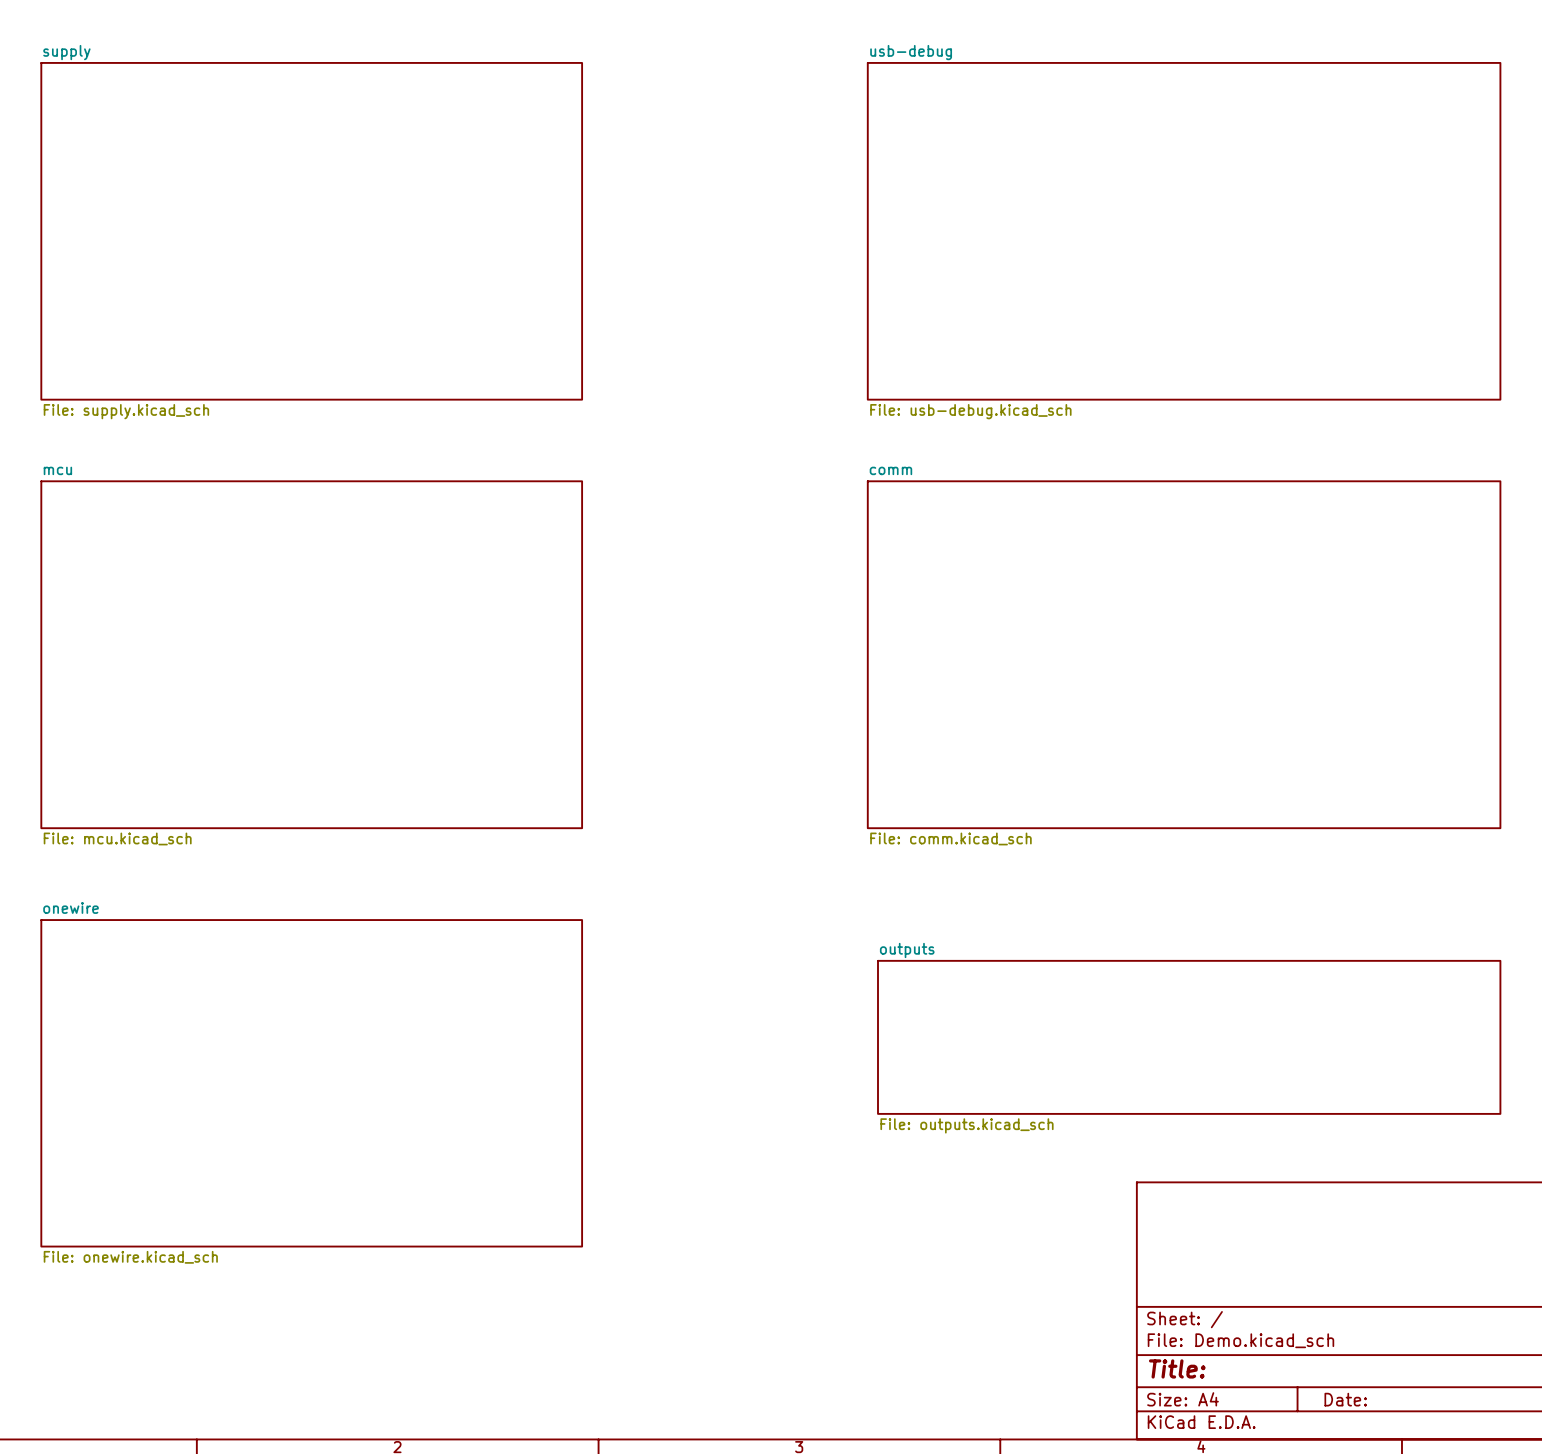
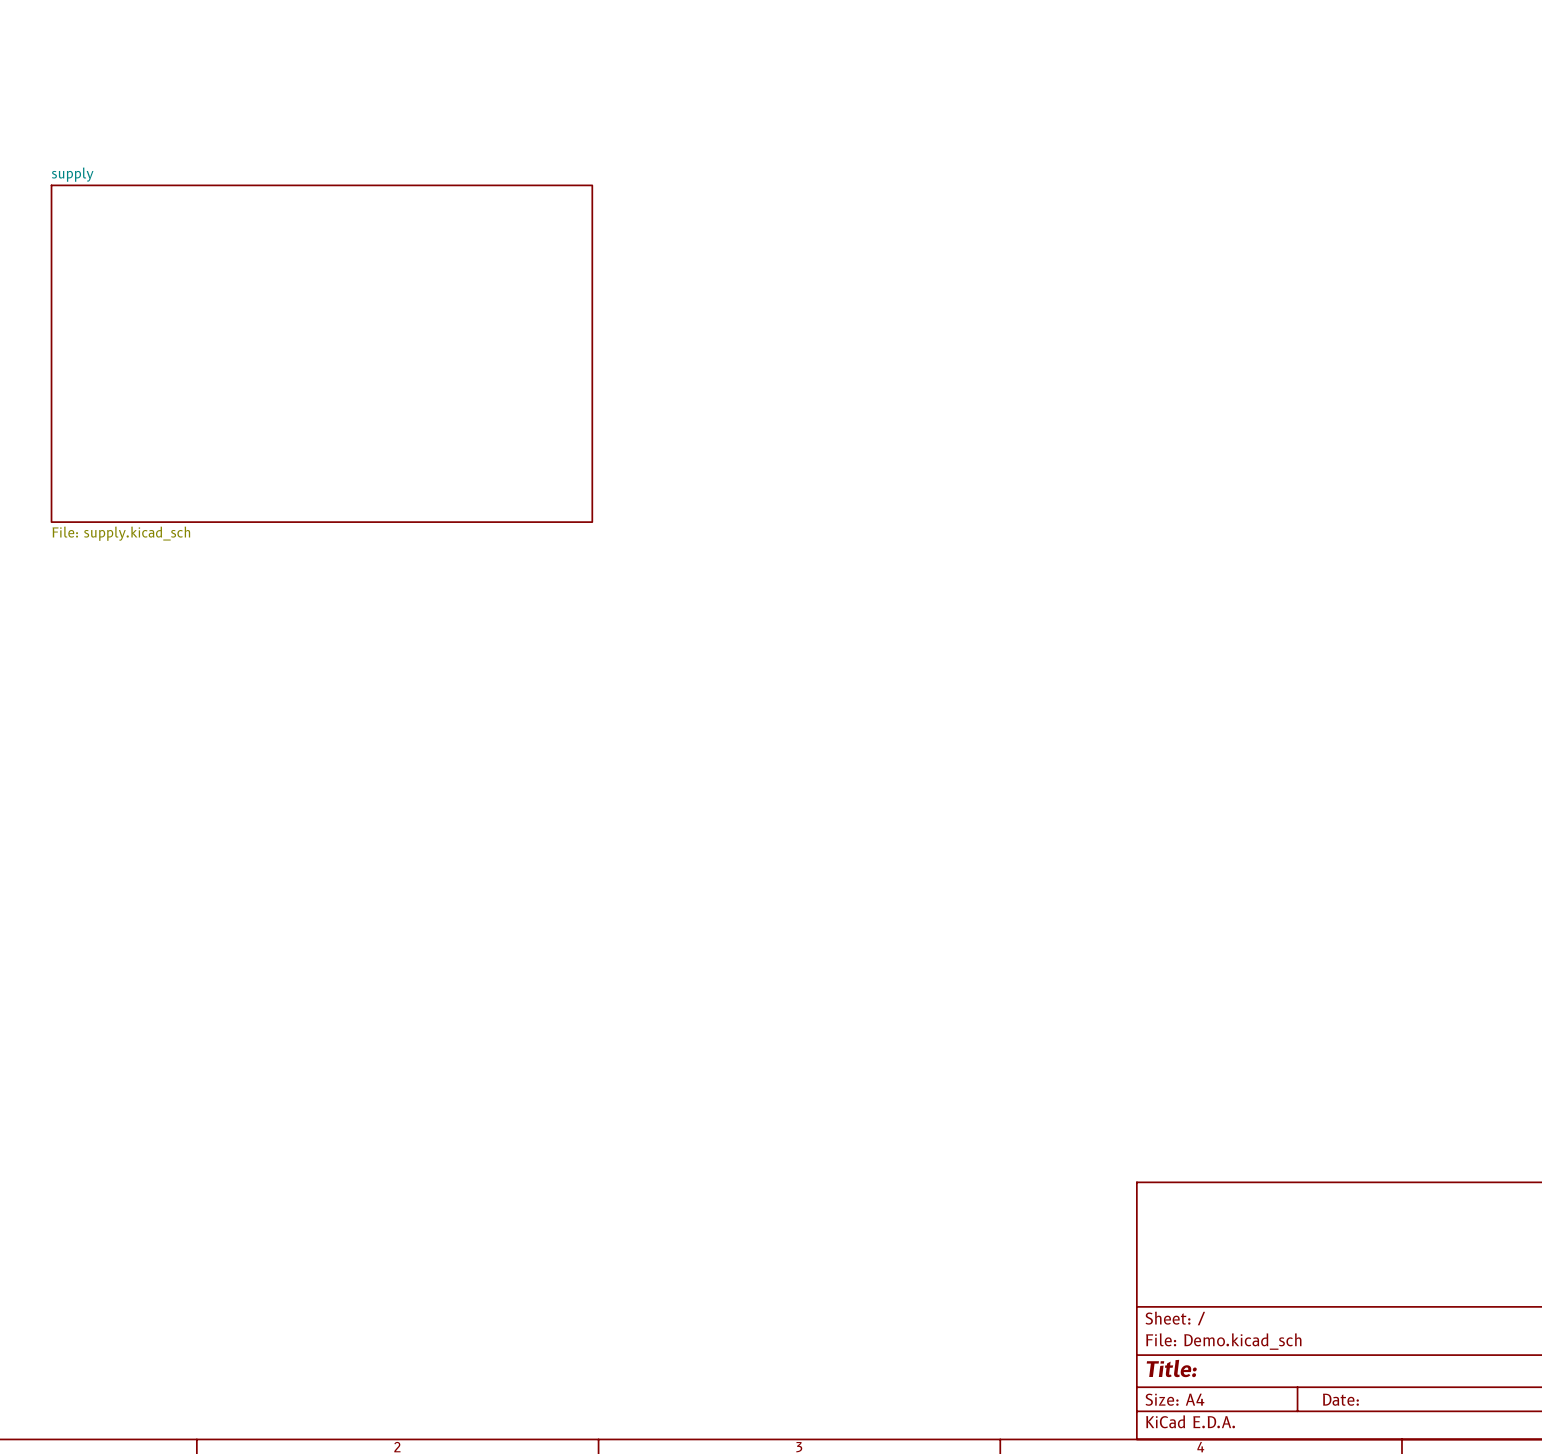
sheet supply position: (311, 231) -> (321, 353)
sheet usb-debug: File: usb-debug.kicad_sch (1184, 231) -> none
sheet mcu: File: mcu.kicad_sch (311, 654) -> none
sheet comm: File: comm.kicad_sch (1184, 654) -> none
sheet outputs: File: outputs.kicad_sch (1189, 1037) -> none
sheet onewire: File: onewire.kicad_sch (311, 1083) -> none

